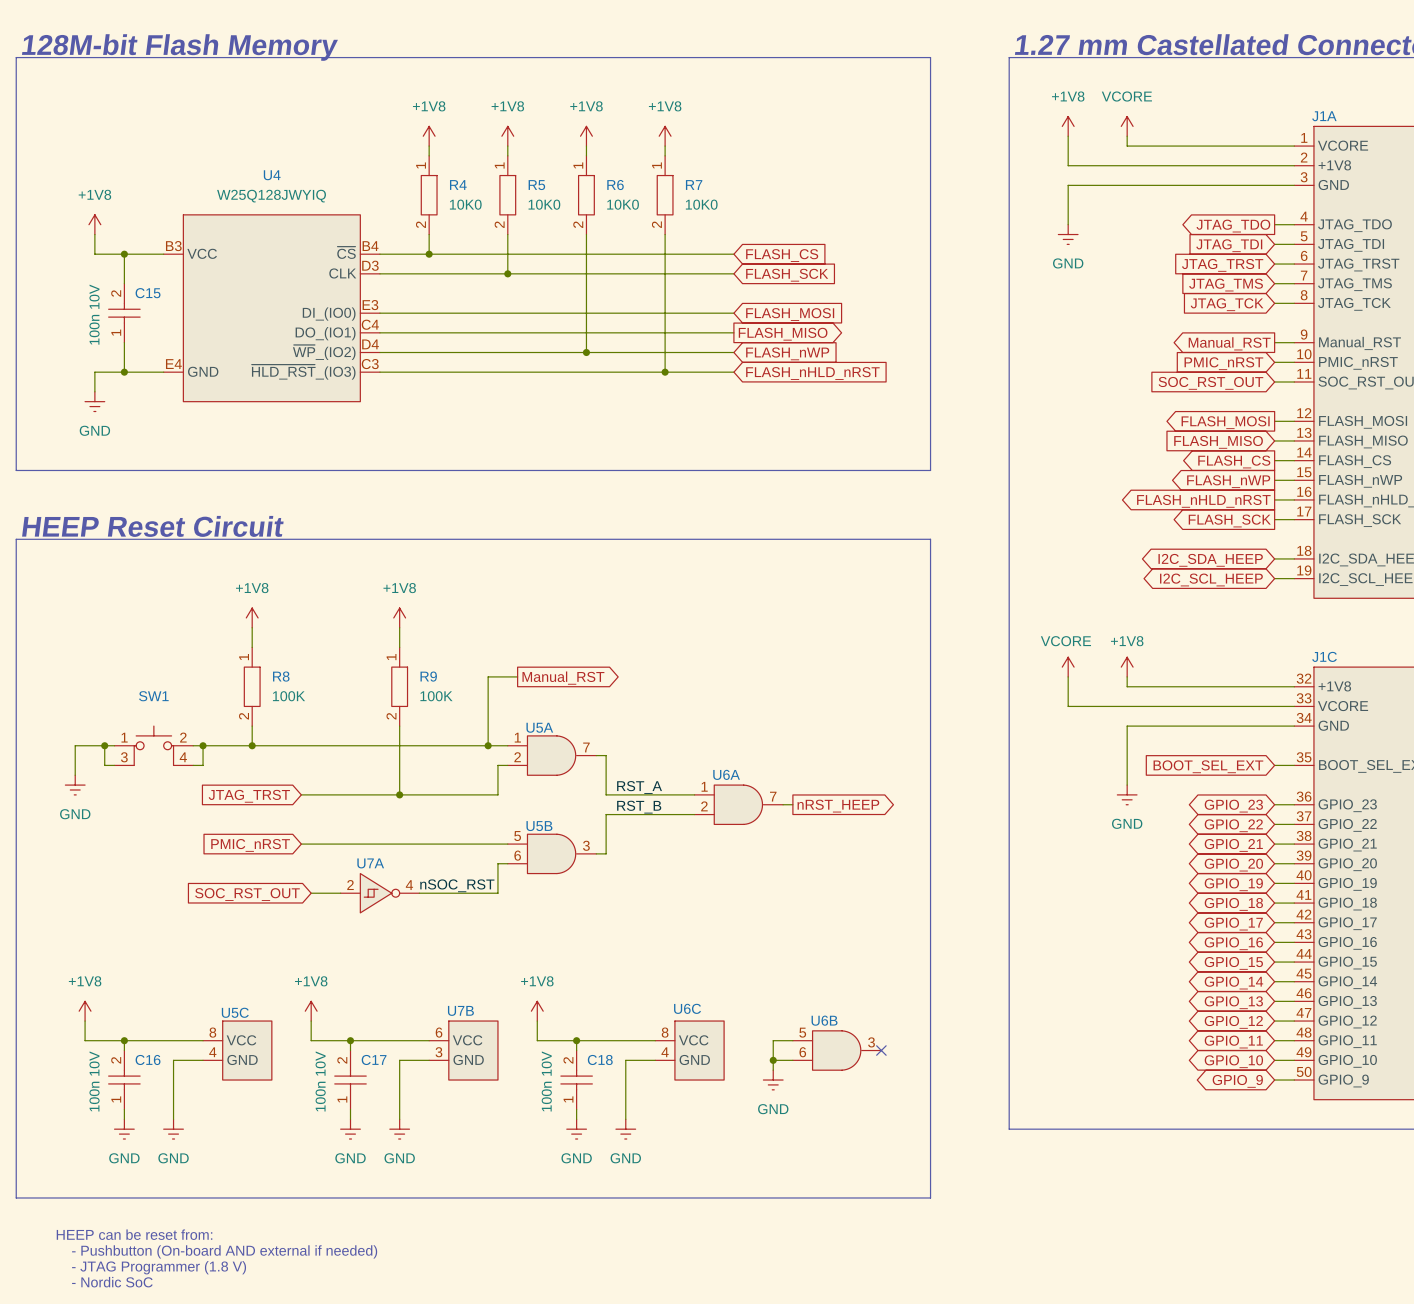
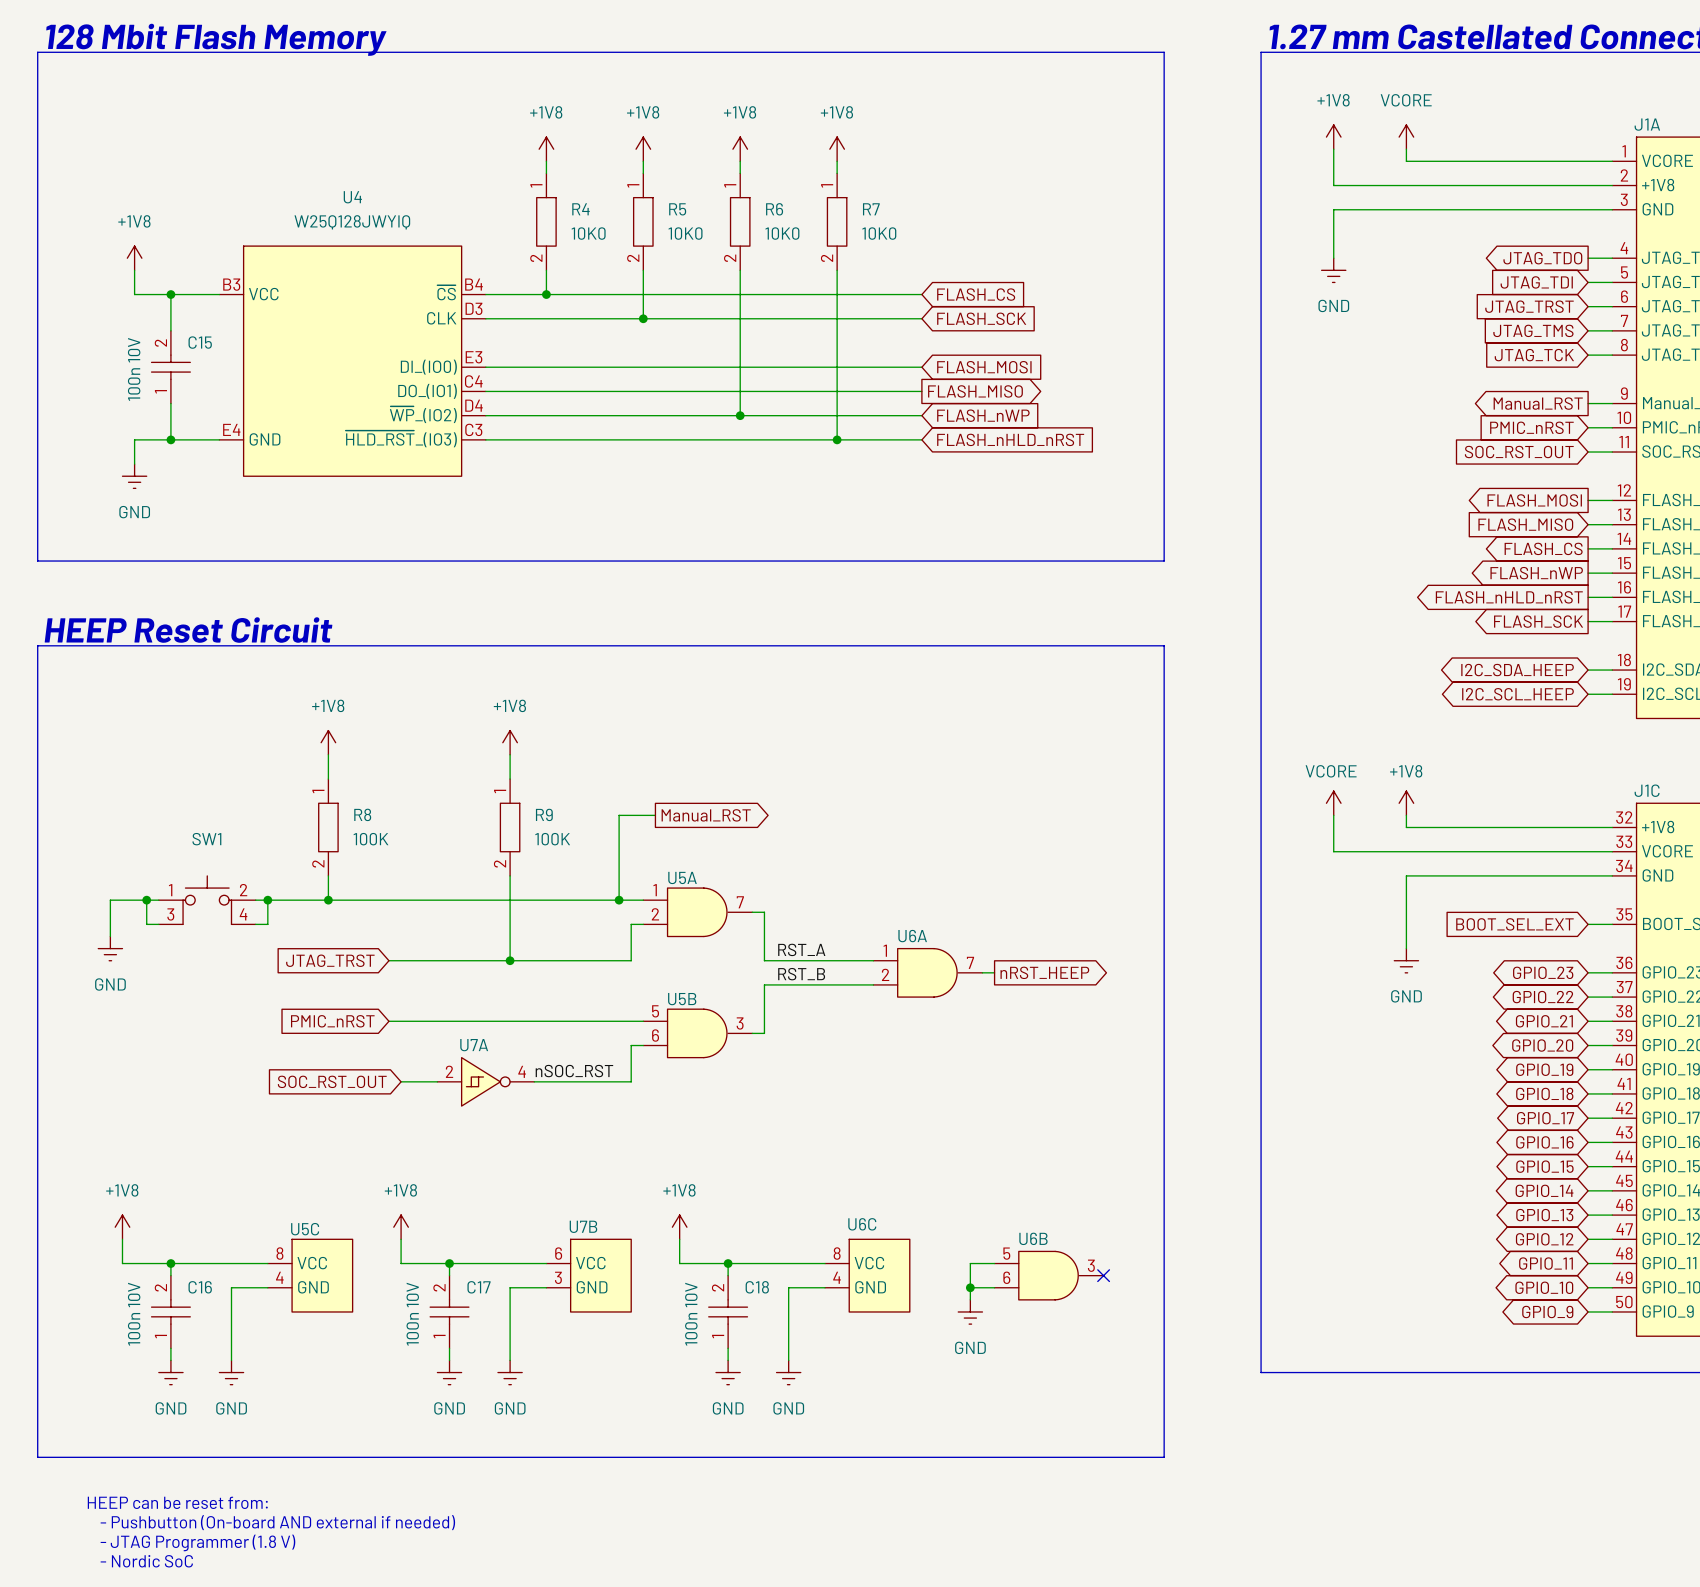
text: 128M-bit Flash Memory (179, 47) -> 128 Mbit Flash Memory (216, 39)

